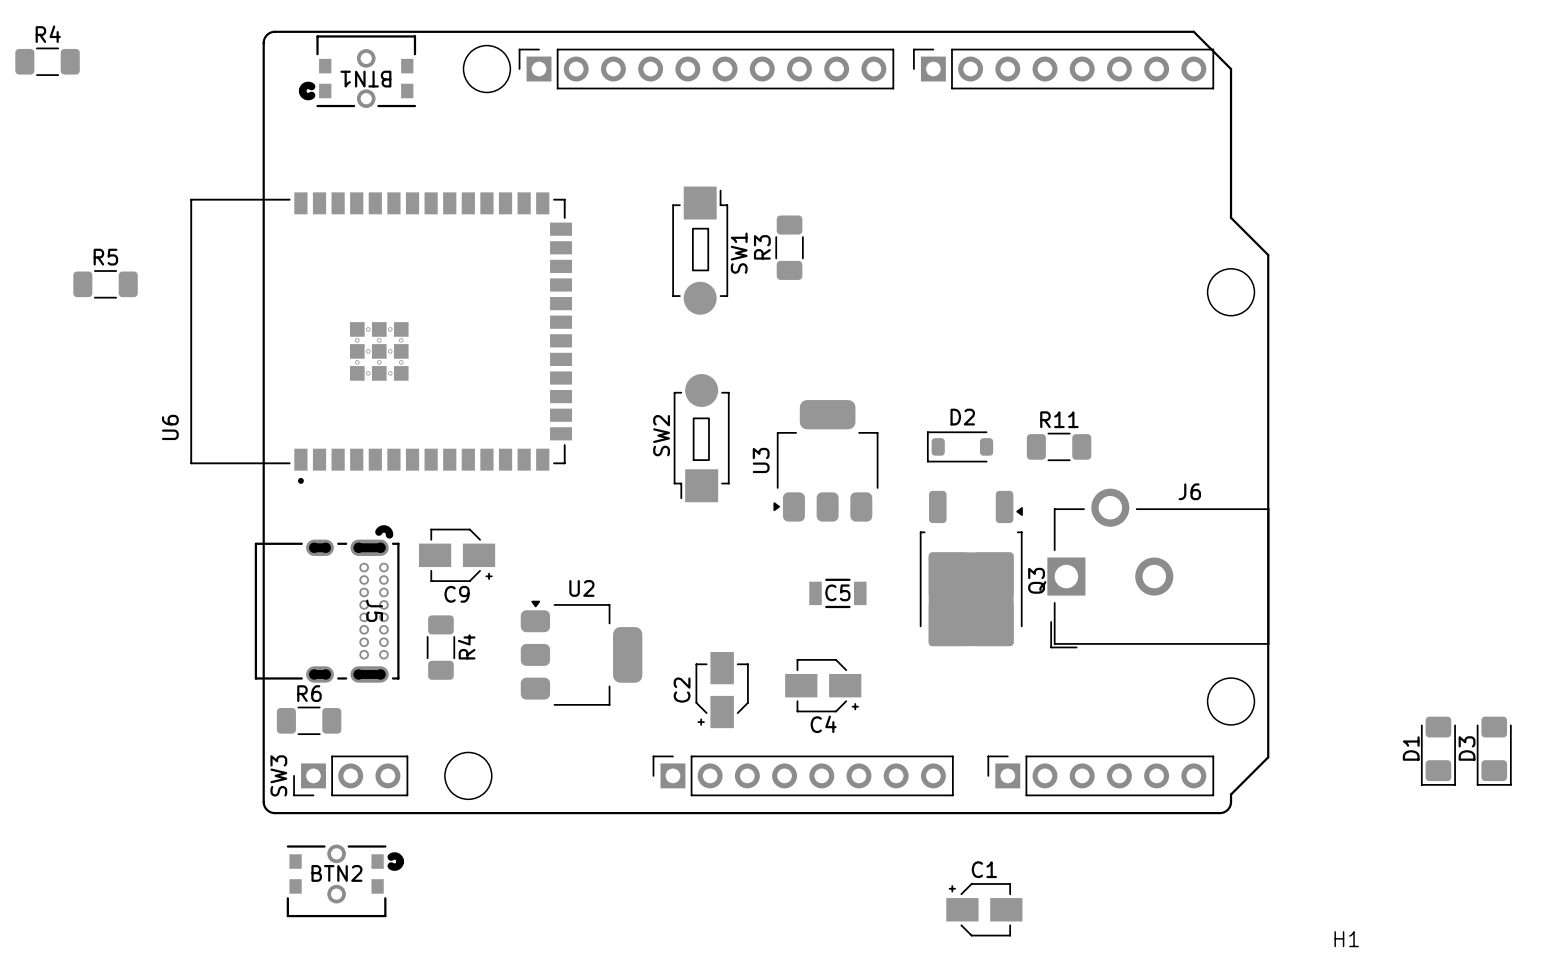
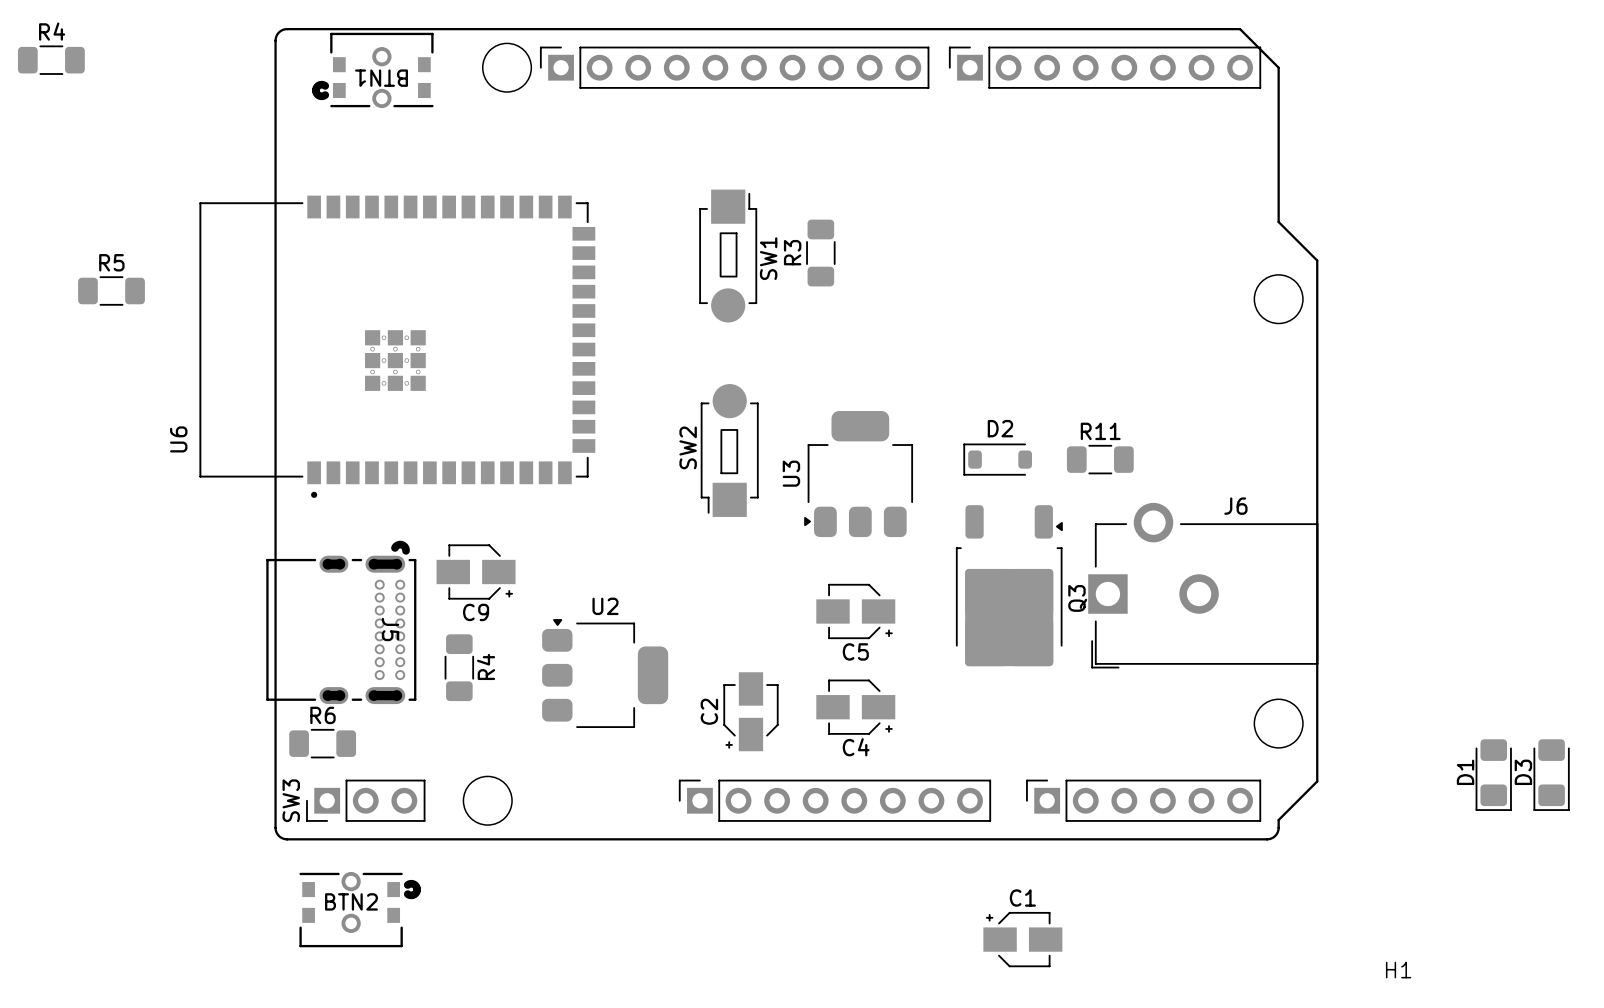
C5 footprint: [809, 578, 867, 609] -> [816, 583, 896, 640]
C5 name position: C5 (837, 592) -> C5 (855, 651)

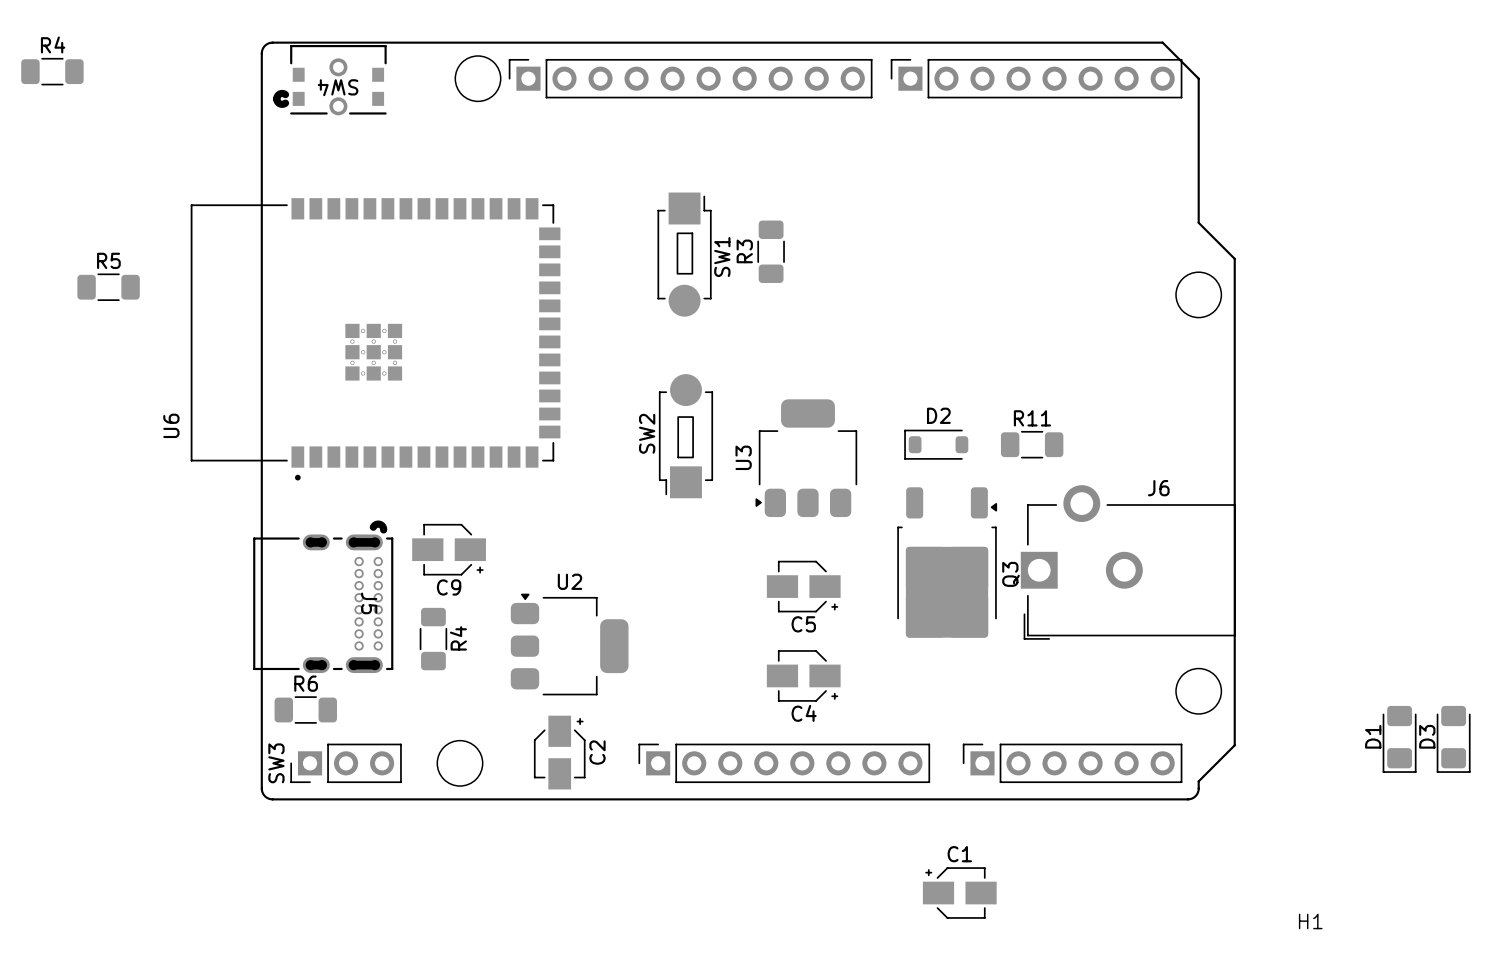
SW4: none -> (329, 80)
BTN1: (372, 70) -> none
C2 rotation: 0° (750, 711) -> 180° (559, 752)
C2 position: (750, 711) -> (559, 752)
BTN2: (360, 909) -> none

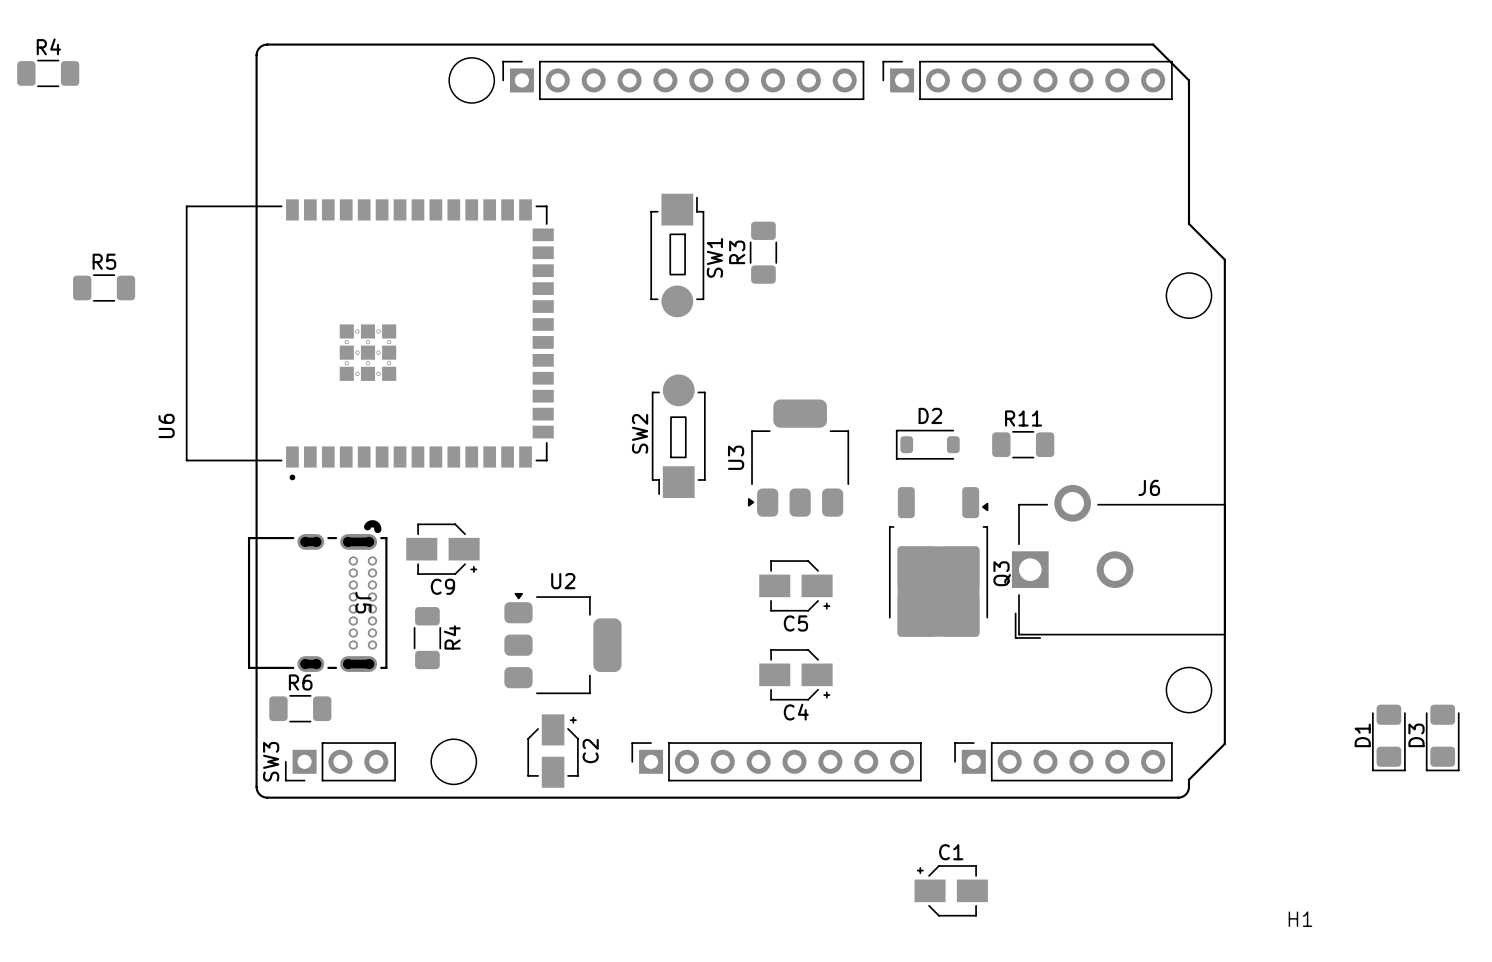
SW4: (329, 80) -> none

